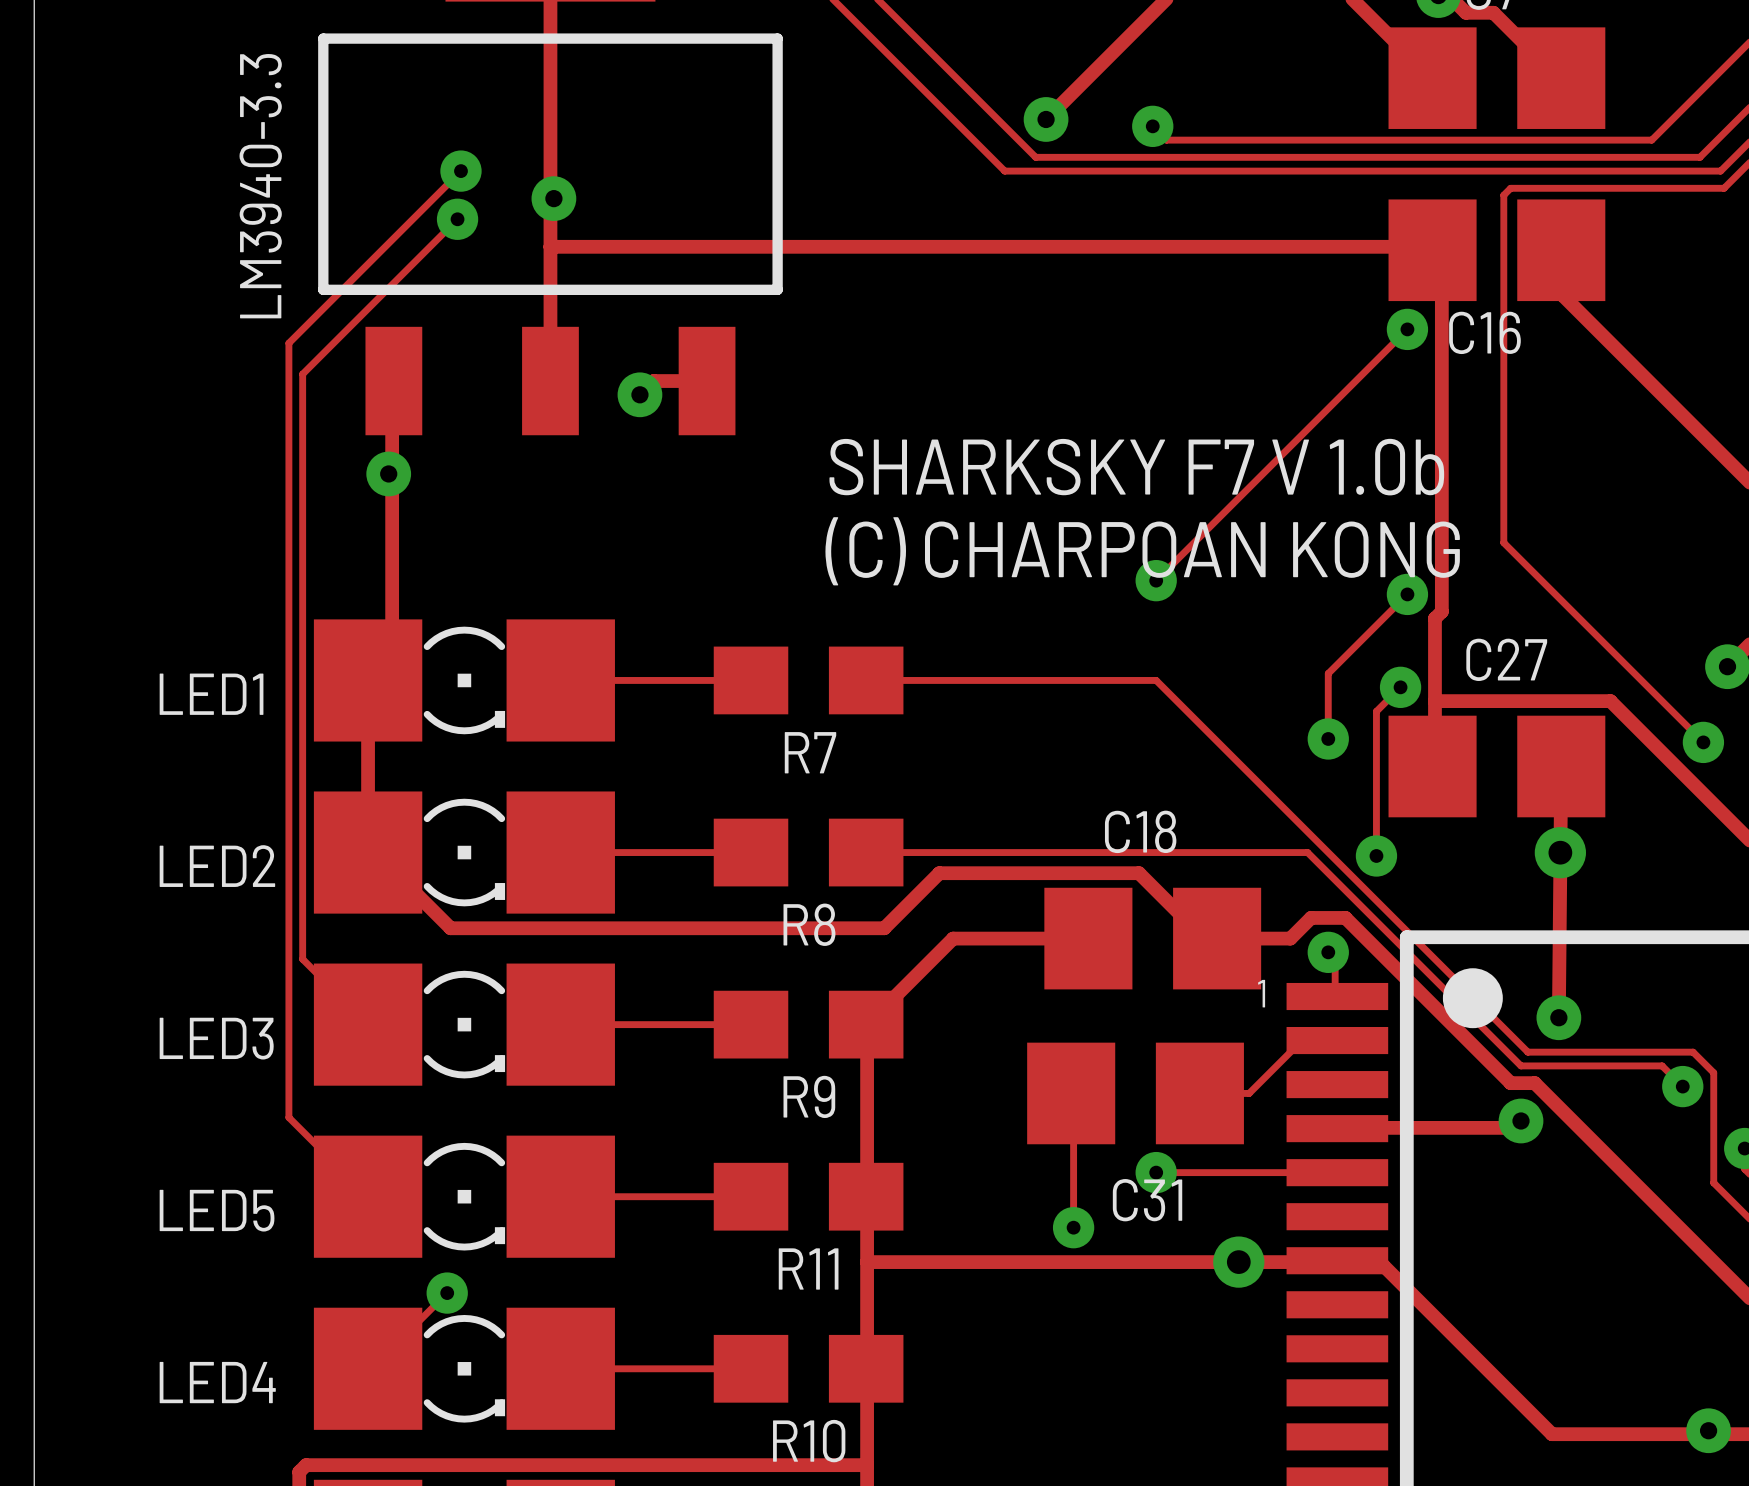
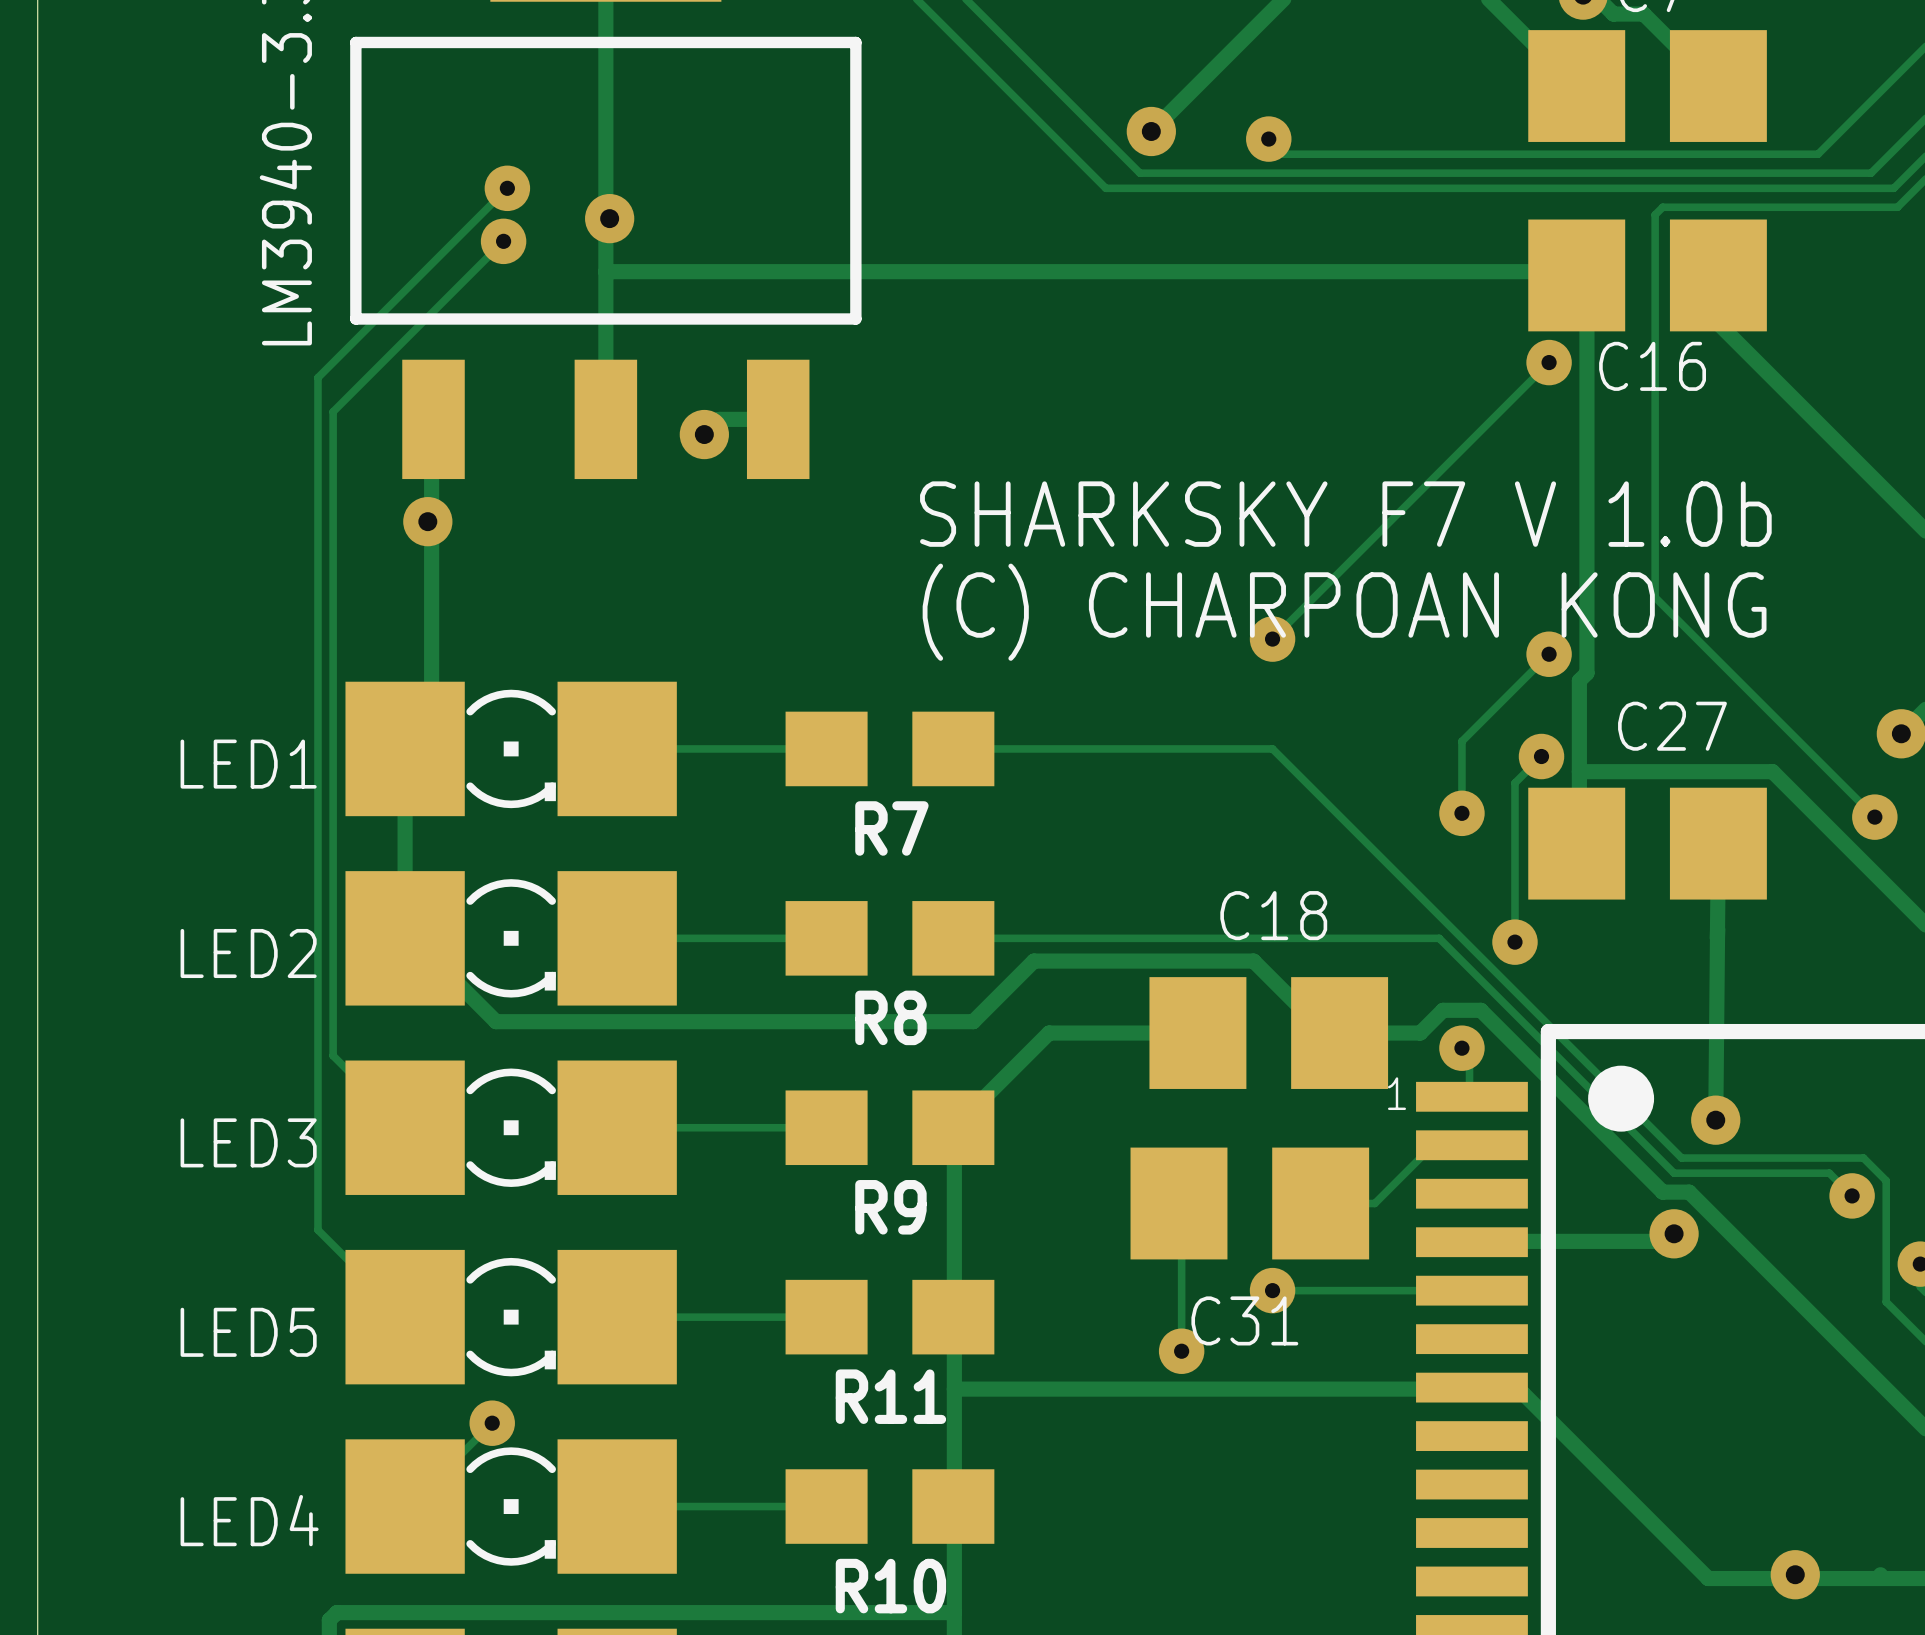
via: (1560, 852) -> none
via: (1238, 1262) -> none
via position: (1708, 1430) -> (1795, 1574)

